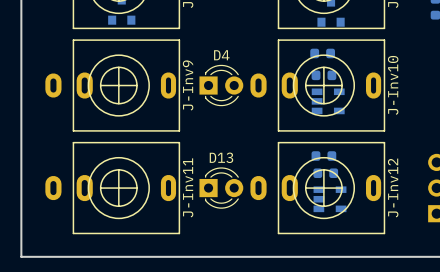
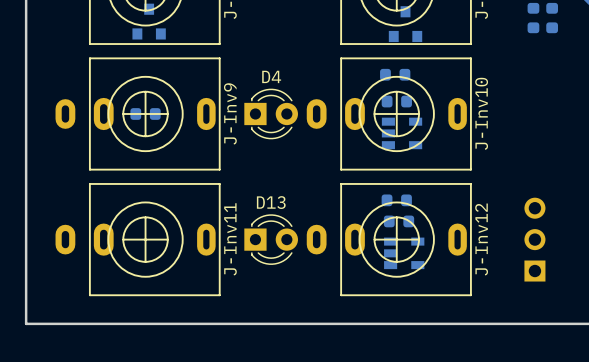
part: none -> (145, 113)

